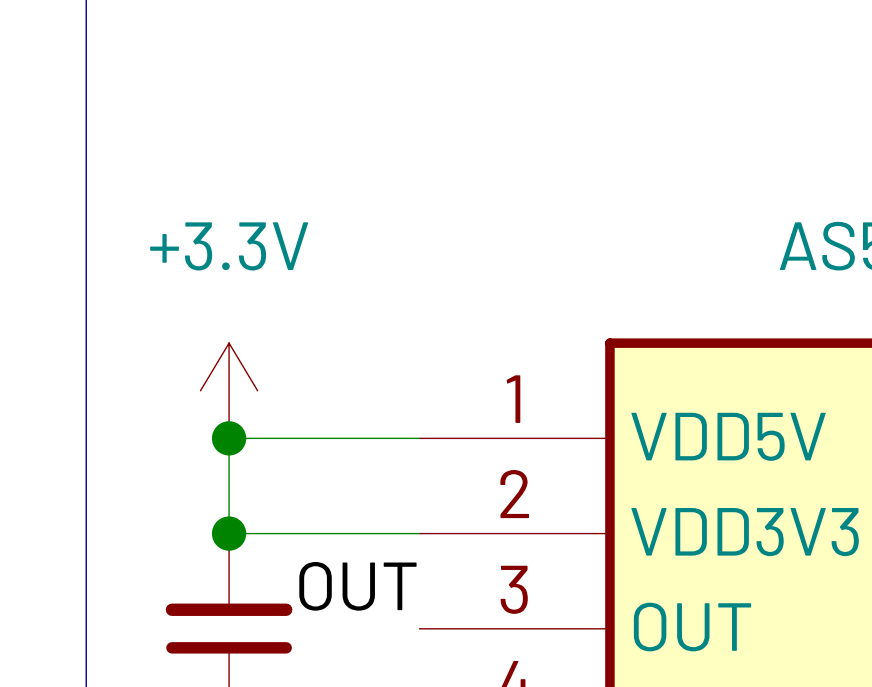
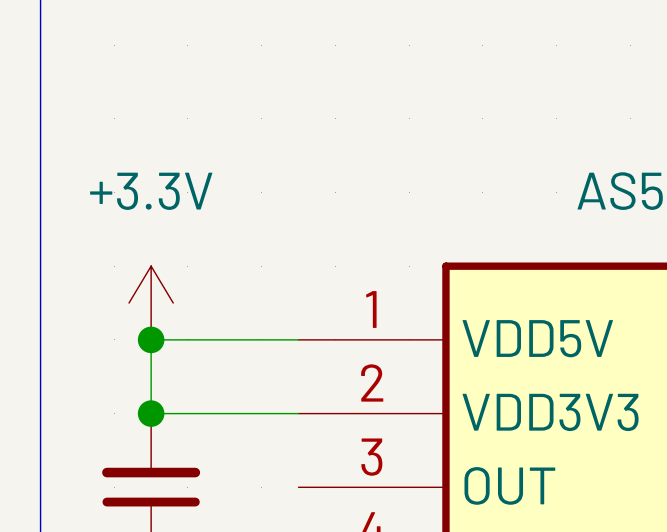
label: OUT (357, 586) -> none

